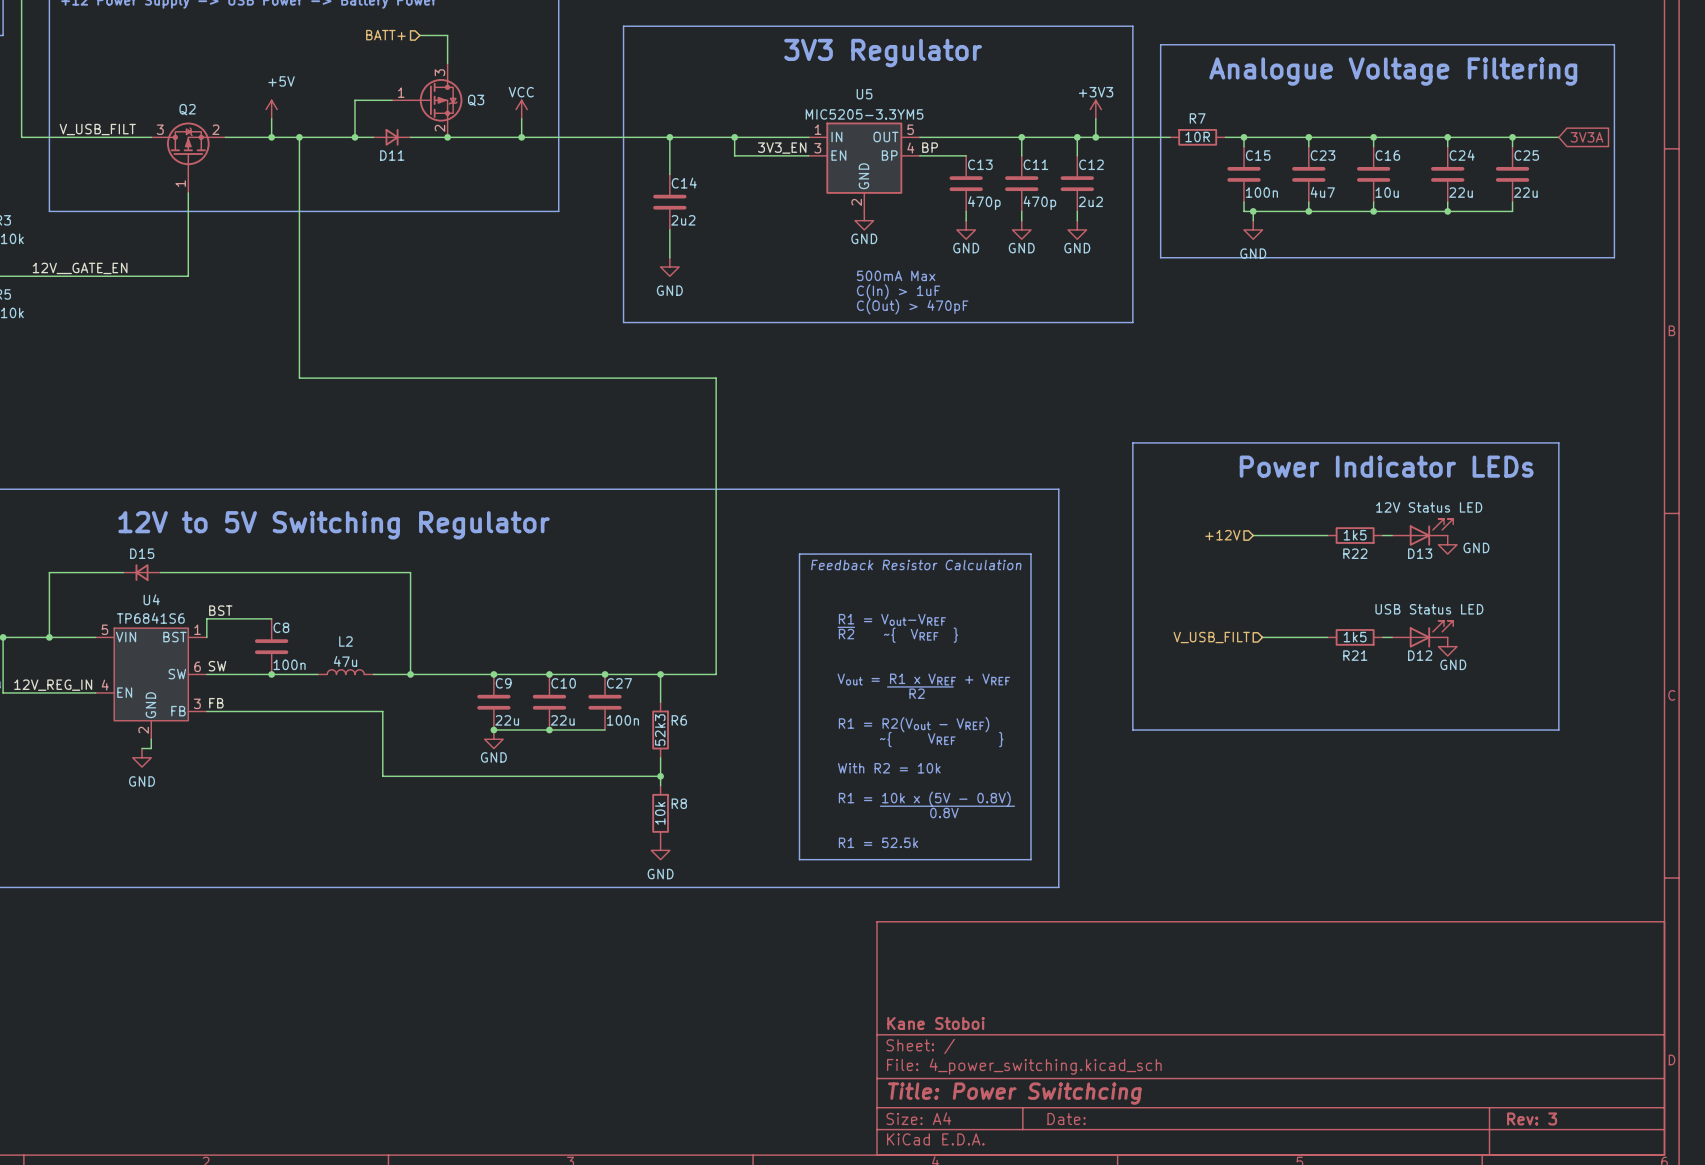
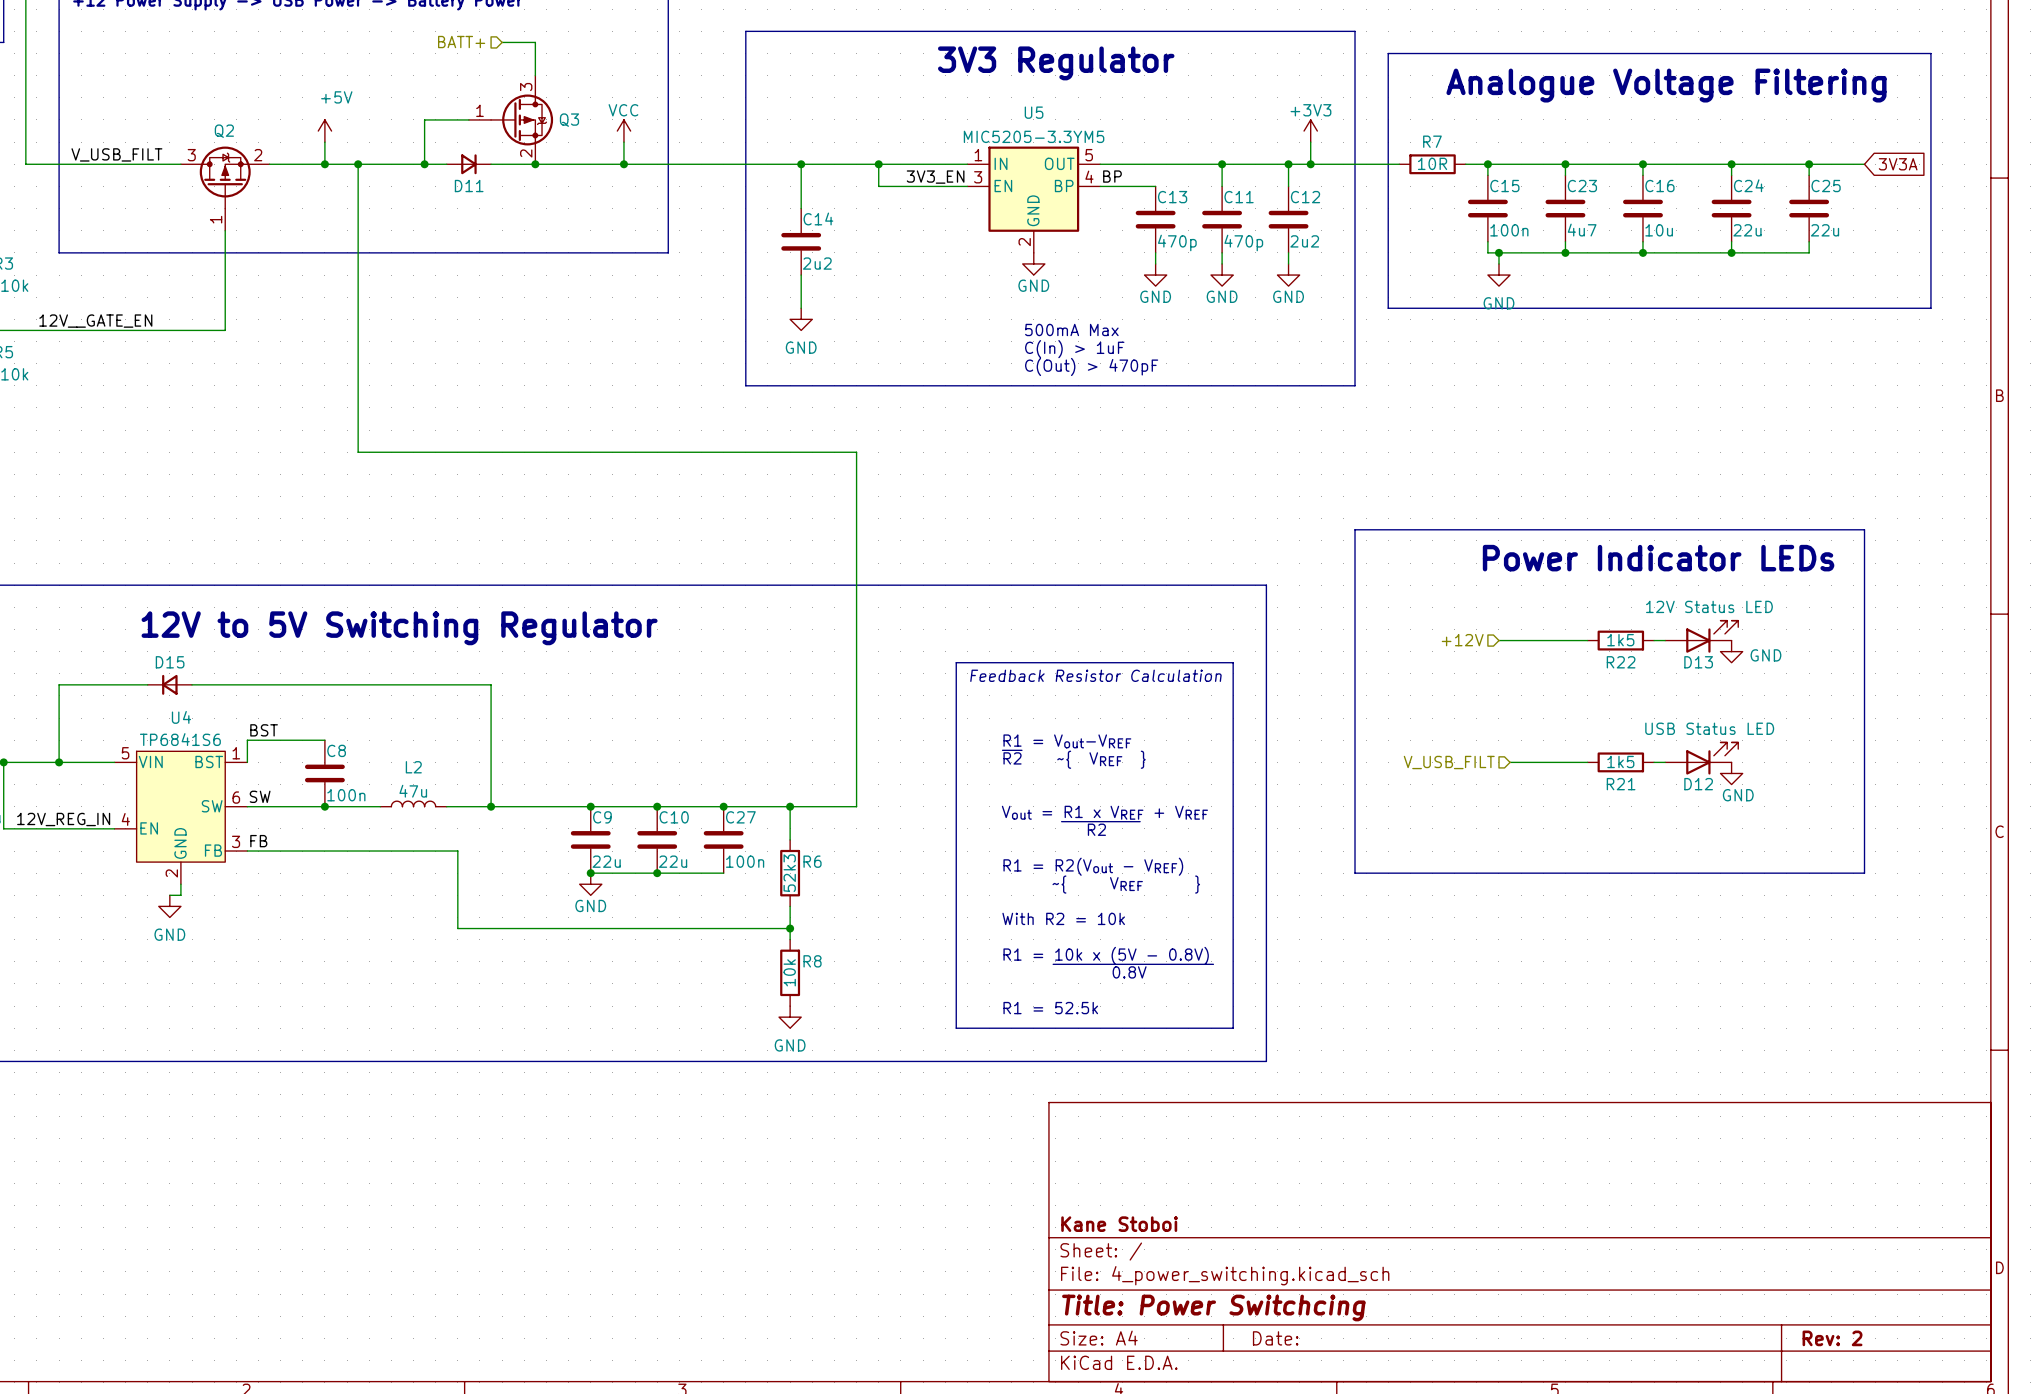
title block: Rev: 3 (1532, 1118) -> Rev: 2 (1832, 1338)

